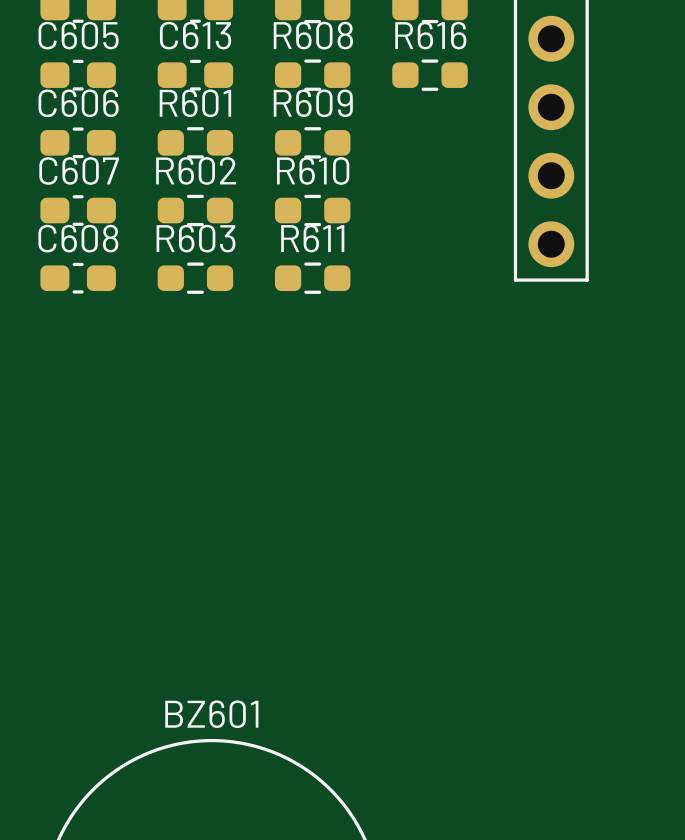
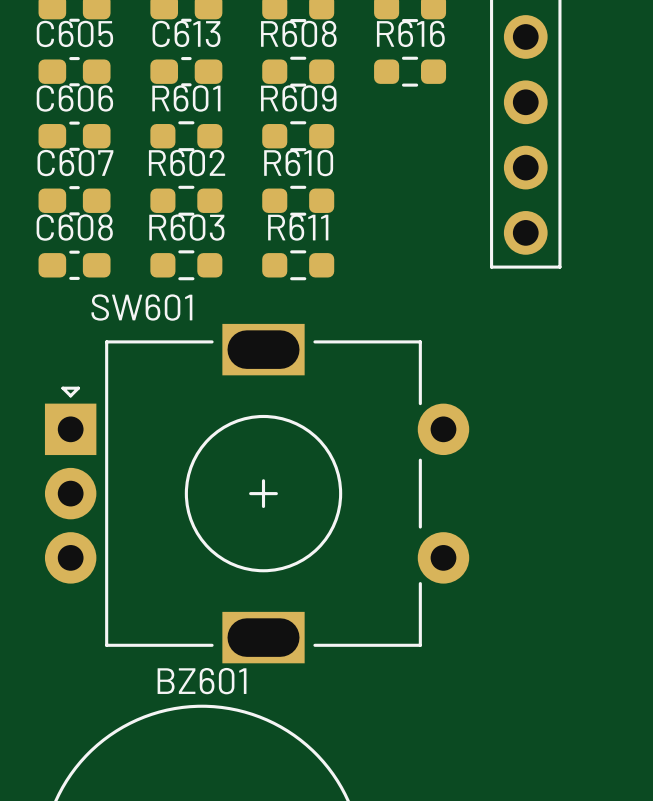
SW601: none -> (257, 493)

